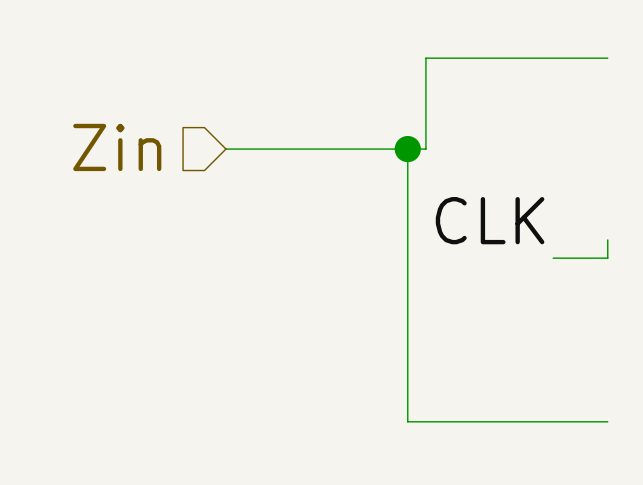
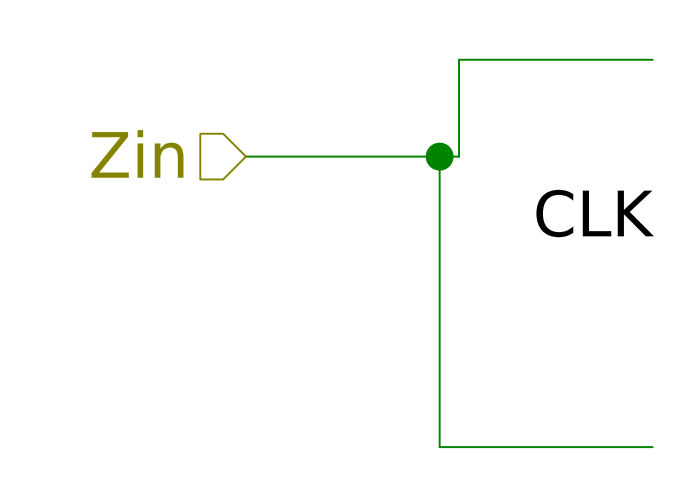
label position: CLK (490, 220) -> CLK (595, 213)
wire: (607, 239) (607, 258) (553, 258) -> none

